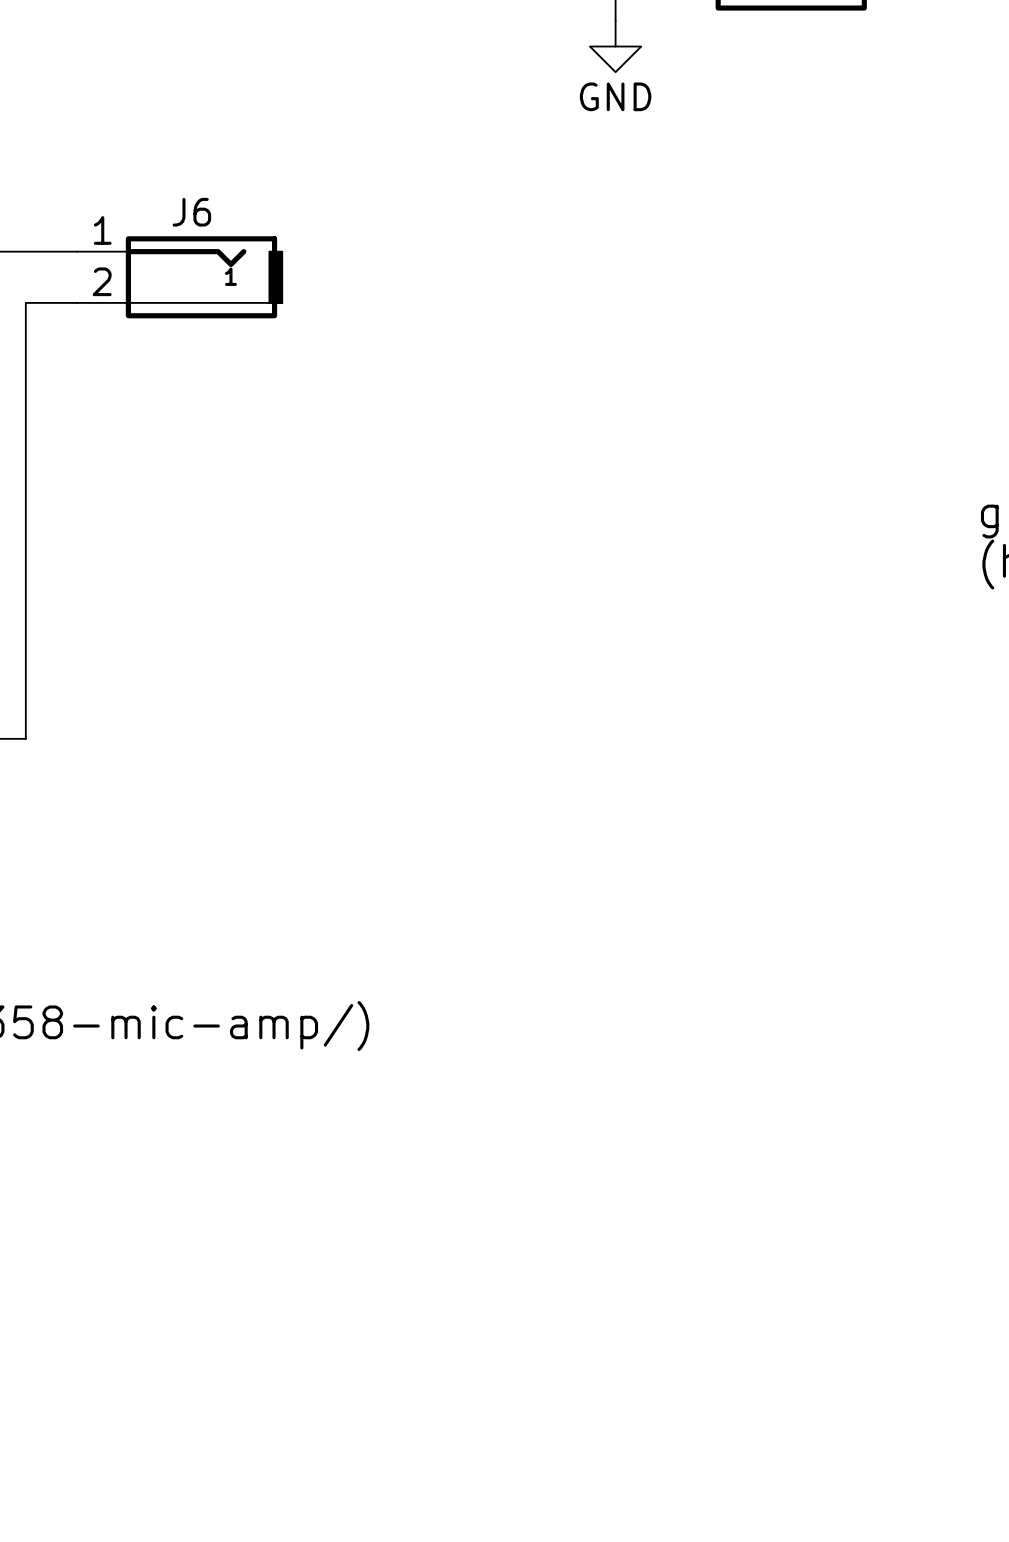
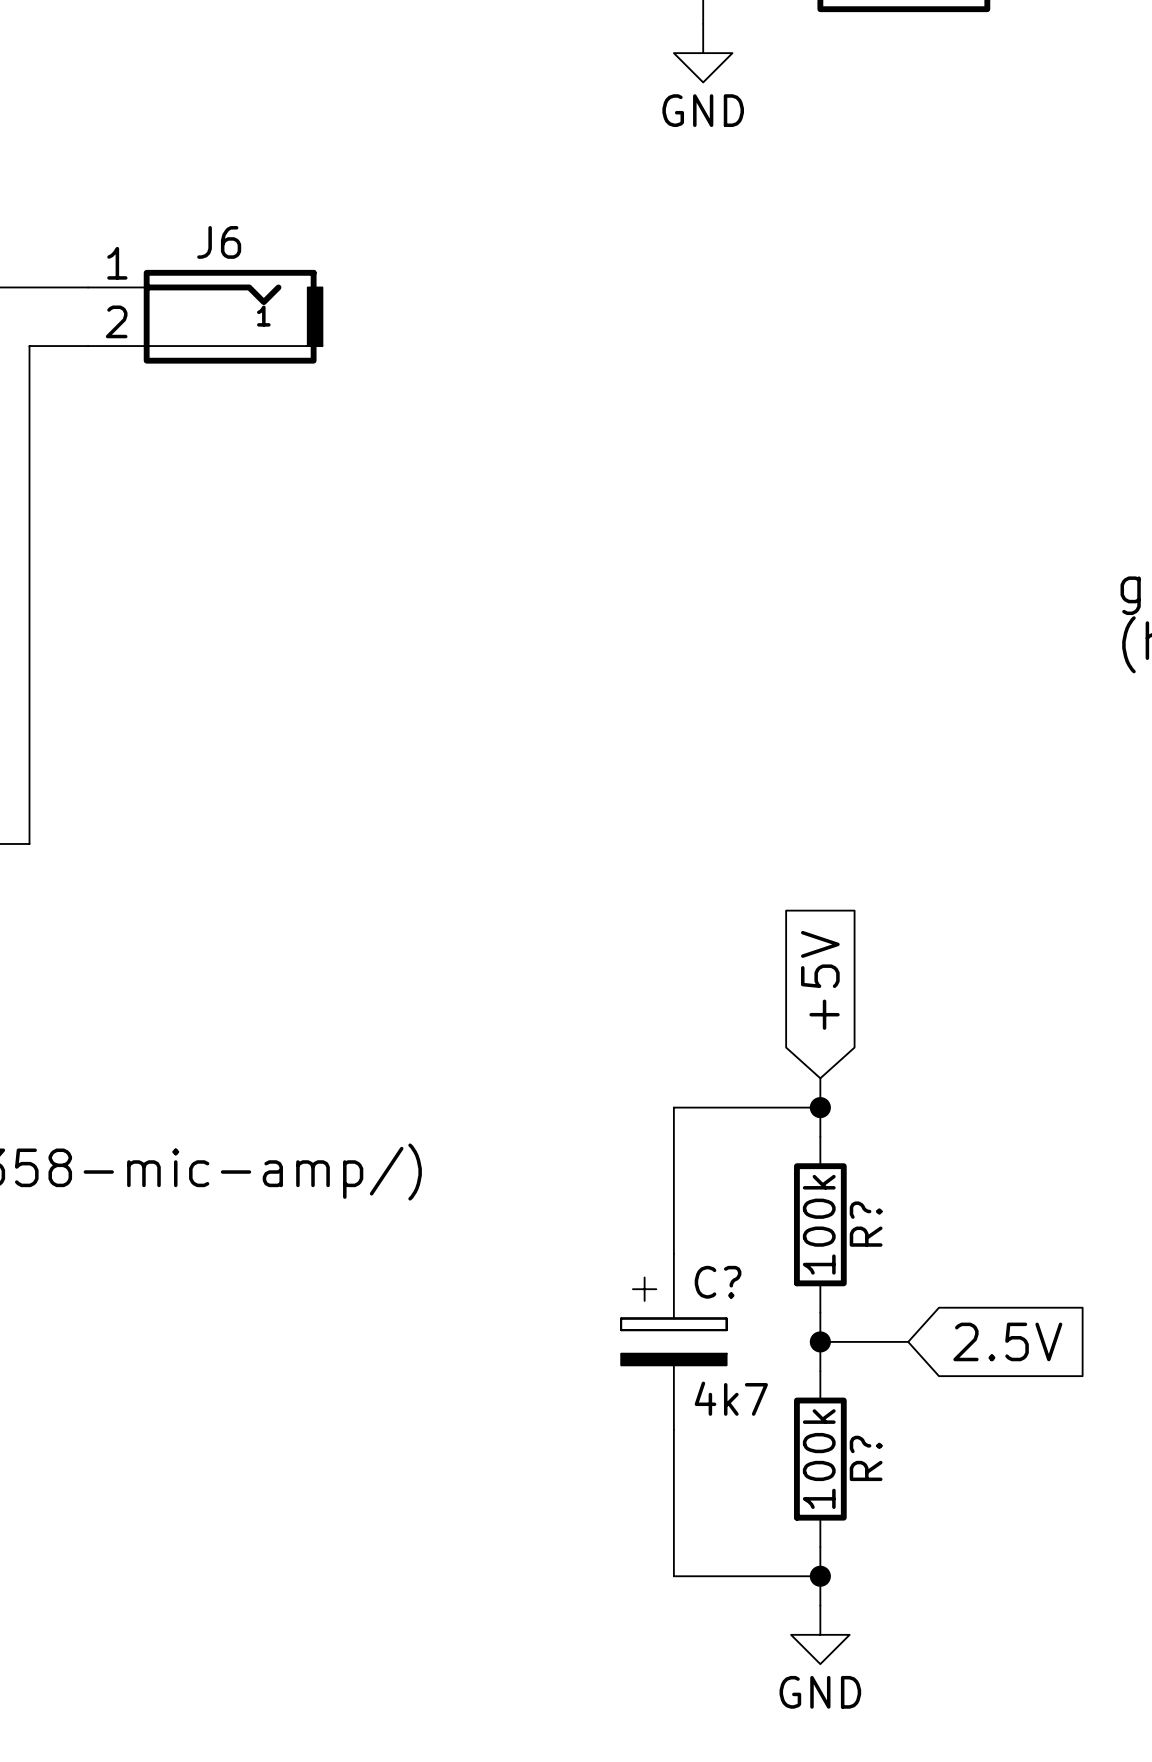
global label: none -> +5V (820, 980)
wire: none -> (820, 1078) (820, 1136)
wire: none -> (820, 1107) (673, 1107) (673, 1254)
junction: none -> (820, 1107)
R?: none -> 100k (820, 1224)
wire: none -> (820, 1312) (820, 1371)
C?: none -> 4k7 (673, 1341)
wire: none -> (820, 1341) (908, 1341)
junction: none -> (820, 1341)
global label: none -> 2.5V (1007, 1341)
wire: none -> (673, 1429) (673, 1576) (820, 1576)
R?: none -> 100k (820, 1459)
wire: none -> (820, 1546) (820, 1605)
junction: none -> (820, 1576)
power symbol: none -> GND (820, 1634)

